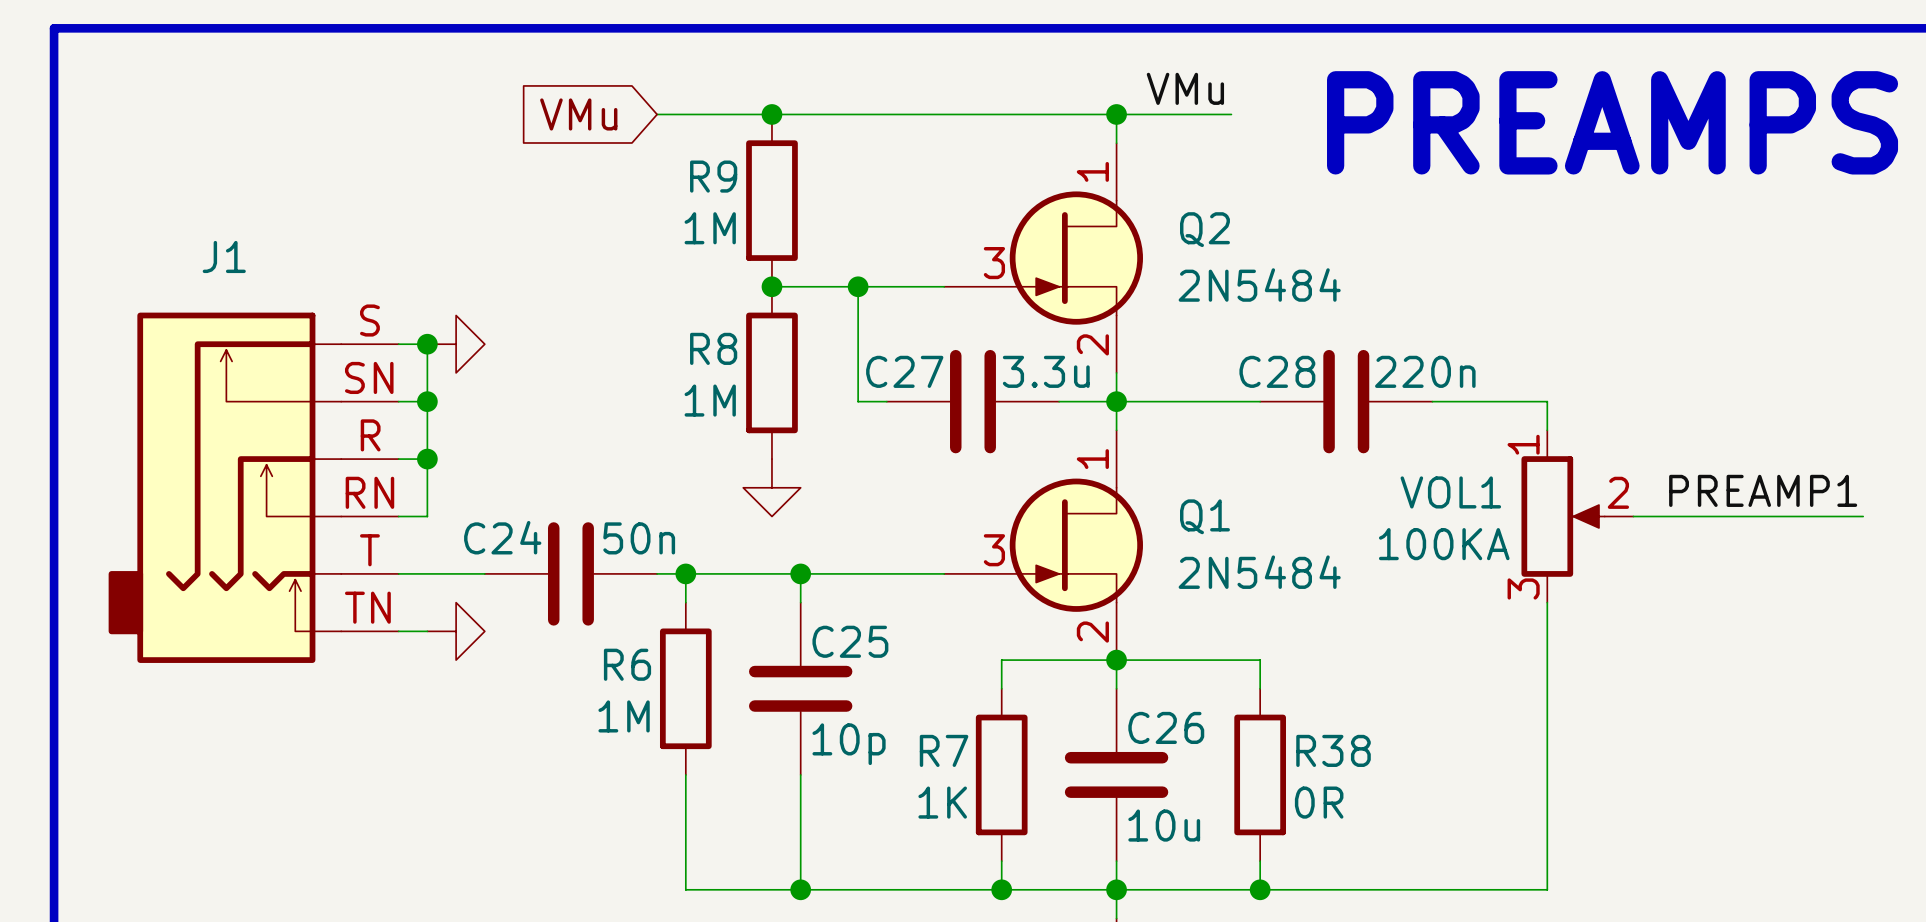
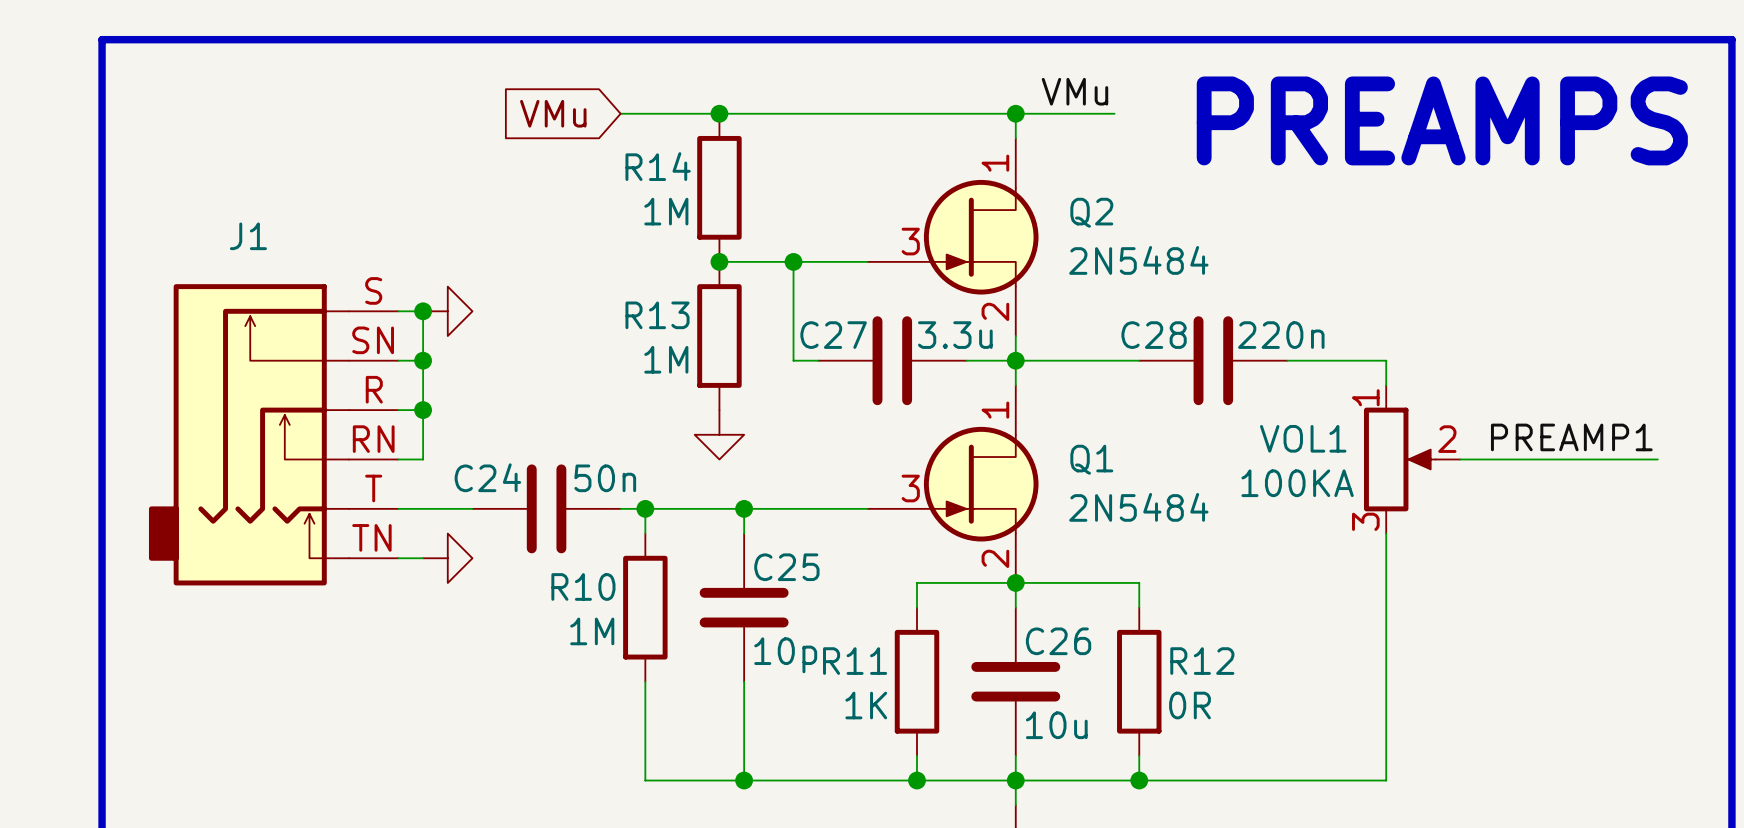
R9 name: R9 (713, 176) -> R14 (658, 166)
R8 name: R8 (713, 348) -> R13 (657, 315)
R6 name: R6 (627, 664) -> R10 (583, 586)
R7 name: R7 (944, 750) -> R11 (855, 661)
R38 name: R38 (1333, 750) -> R12 (1202, 661)

